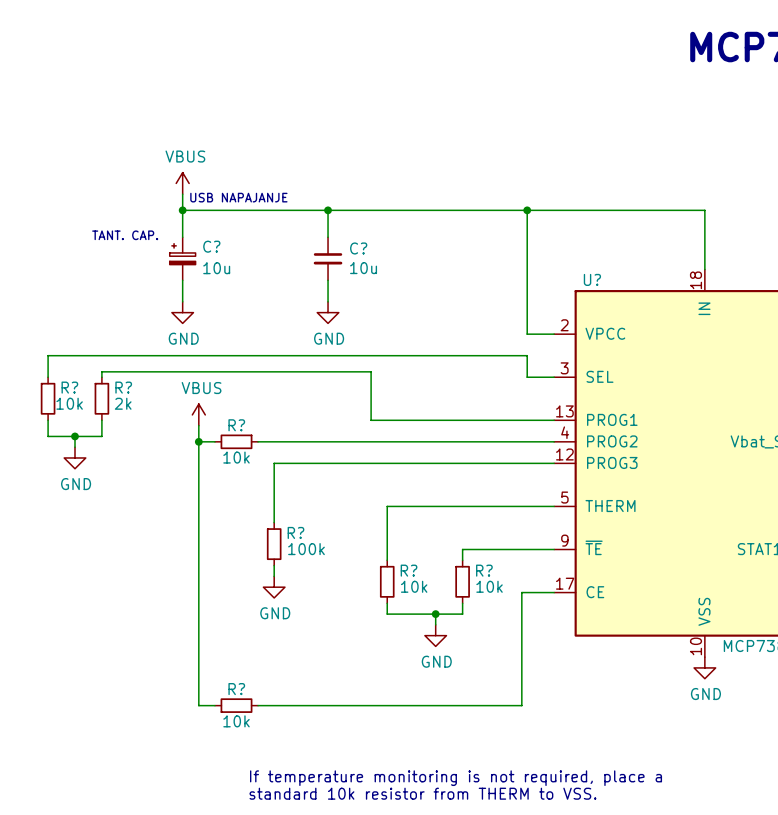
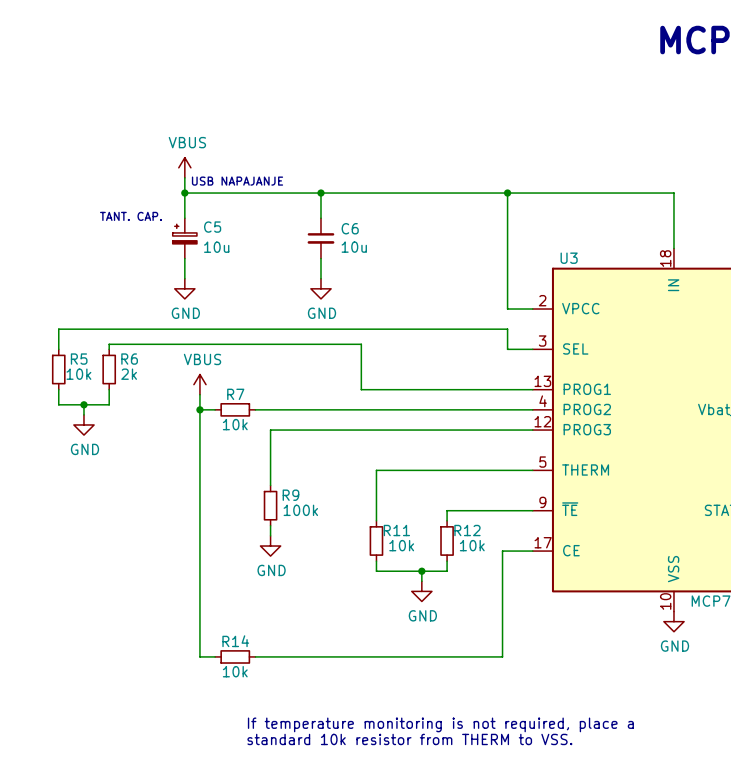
C? name: C? (211, 246) -> C5 (212, 227)
C? name: C? (358, 248) -> C6 (350, 228)
U? name: U? (592, 279) -> U3 (569, 258)
R? name: R? (69, 387) -> R5 (79, 359)
R? name: R? (123, 387) -> R6 (129, 359)
R? name: R? (236, 425) -> R7 (235, 394)
R? name: R? (295, 532) -> R9 (290, 495)
R? name: R? (409, 570) -> R11 (396, 530)
R? name: R? (484, 570) -> R12 (467, 530)
R? name: R? (236, 689) -> R14 (235, 641)

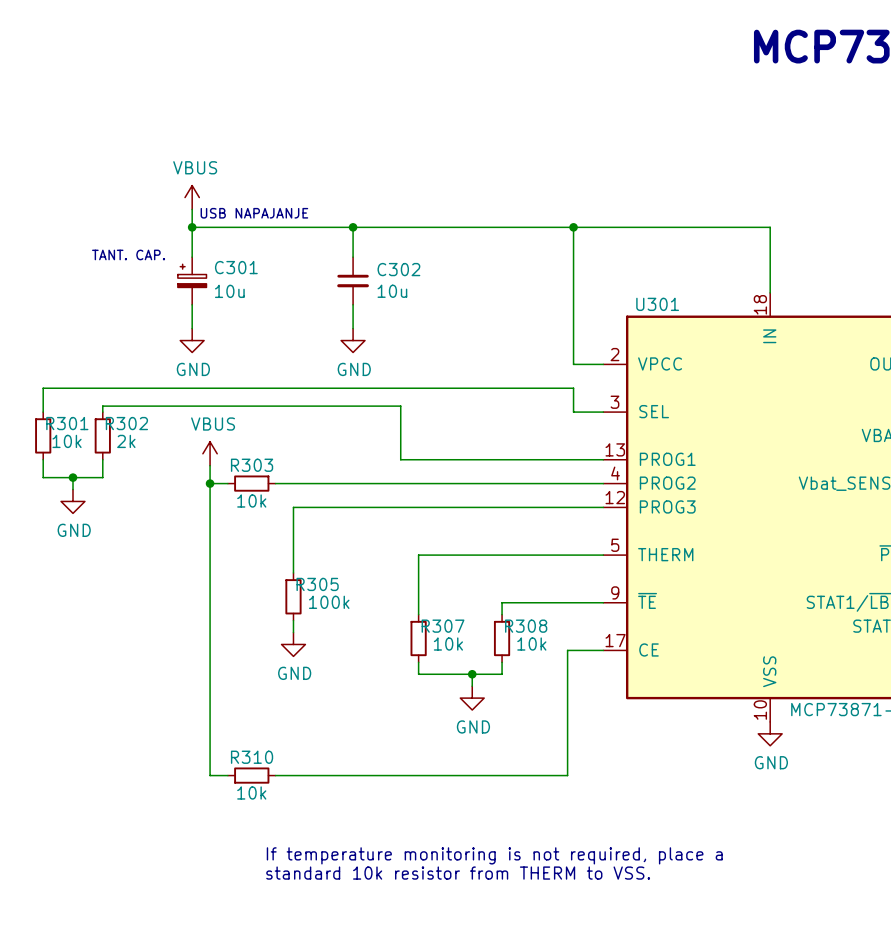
C5 name: C5 (212, 227) -> C301 (236, 267)
C6 name: C6 (350, 228) -> C302 (398, 269)
U3 name: U3 (569, 258) -> U301 (657, 304)
R5 name: R5 (79, 359) -> R301 (67, 423)
R6 name: R6 (129, 359) -> R302 (126, 423)
R7 name: R7 (235, 394) -> R303 (252, 465)
R9 name: R9 (290, 495) -> R305 (317, 584)
R11 name: R11 (396, 530) -> R307 (443, 626)
R12 name: R12 (467, 530) -> R308 (526, 626)
R14 name: R14 (235, 641) -> R310 (252, 757)

